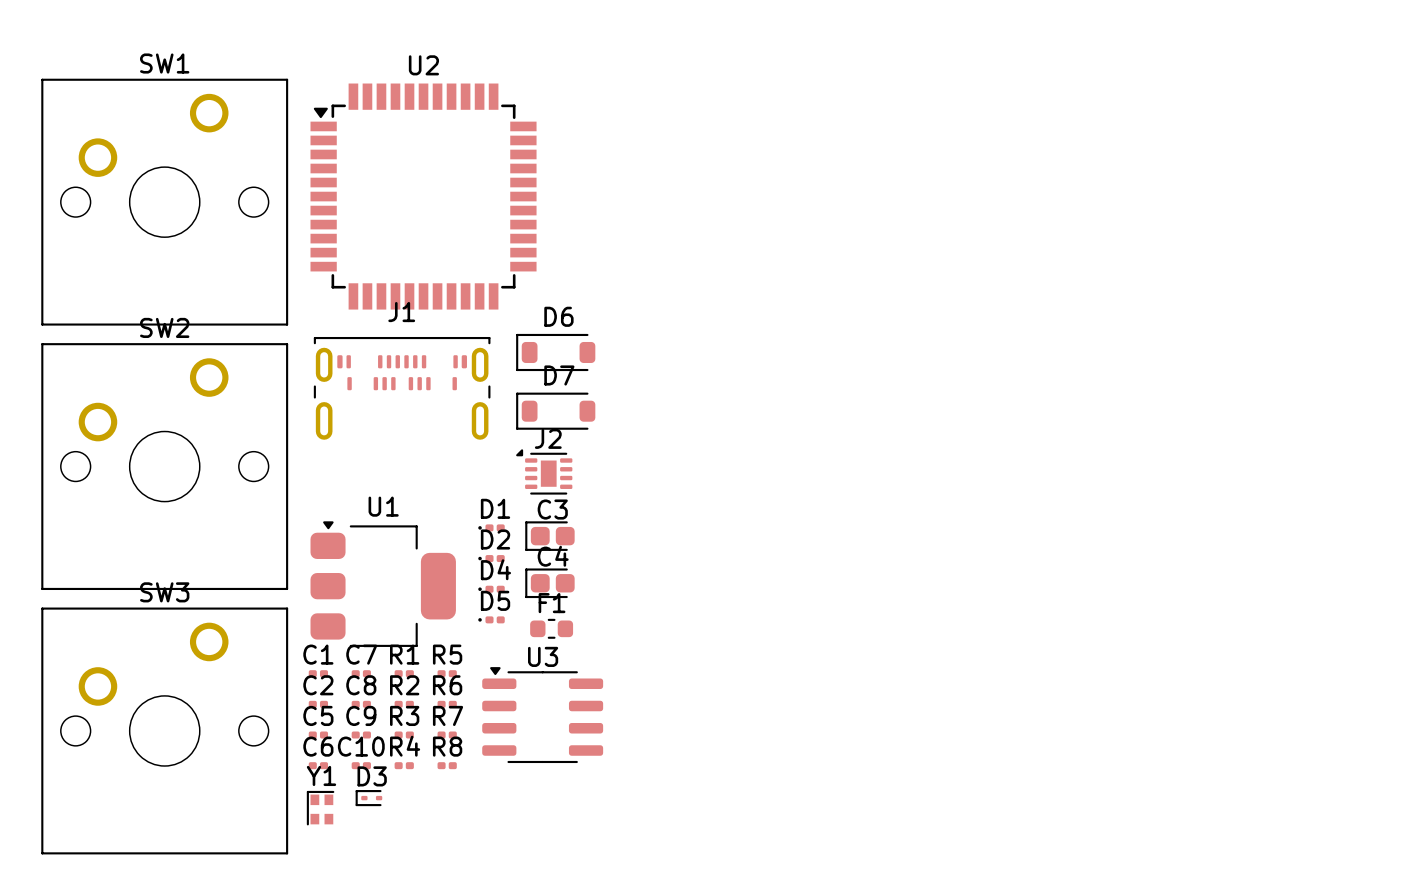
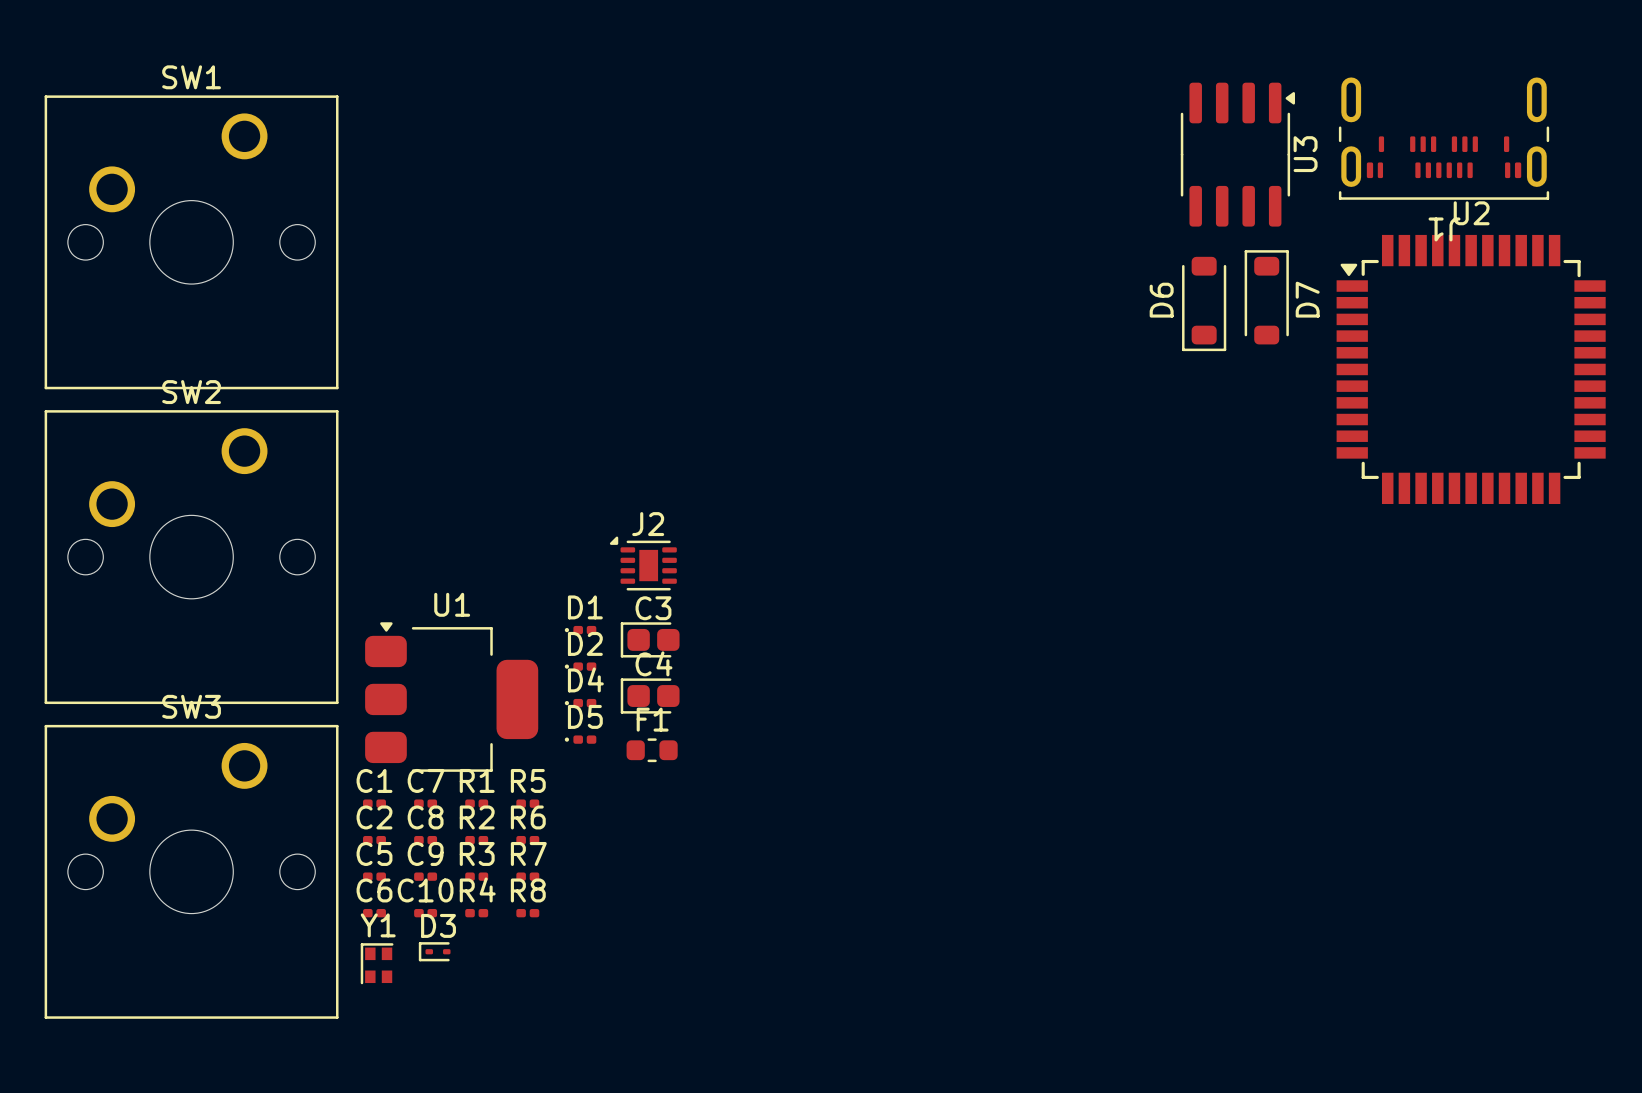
U2 position: (423, 196) -> (1471, 369)
D6 rotation: 0° (555, 352) -> 90° counterclockwise (1204, 303)
D6 position: (555, 352) -> (1204, 303)
J1 rotation: 0° (402, 388) -> 180° (1444, 138)
J1 position: (402, 388) -> (1444, 138)
D7 rotation: 0° (555, 411) -> 90° clockwise (1266, 297)
D7 position: (555, 411) -> (1266, 297)
U3 rotation: 0° (542, 715) -> 90° clockwise (1237, 154)
U3 position: (542, 715) -> (1237, 154)

